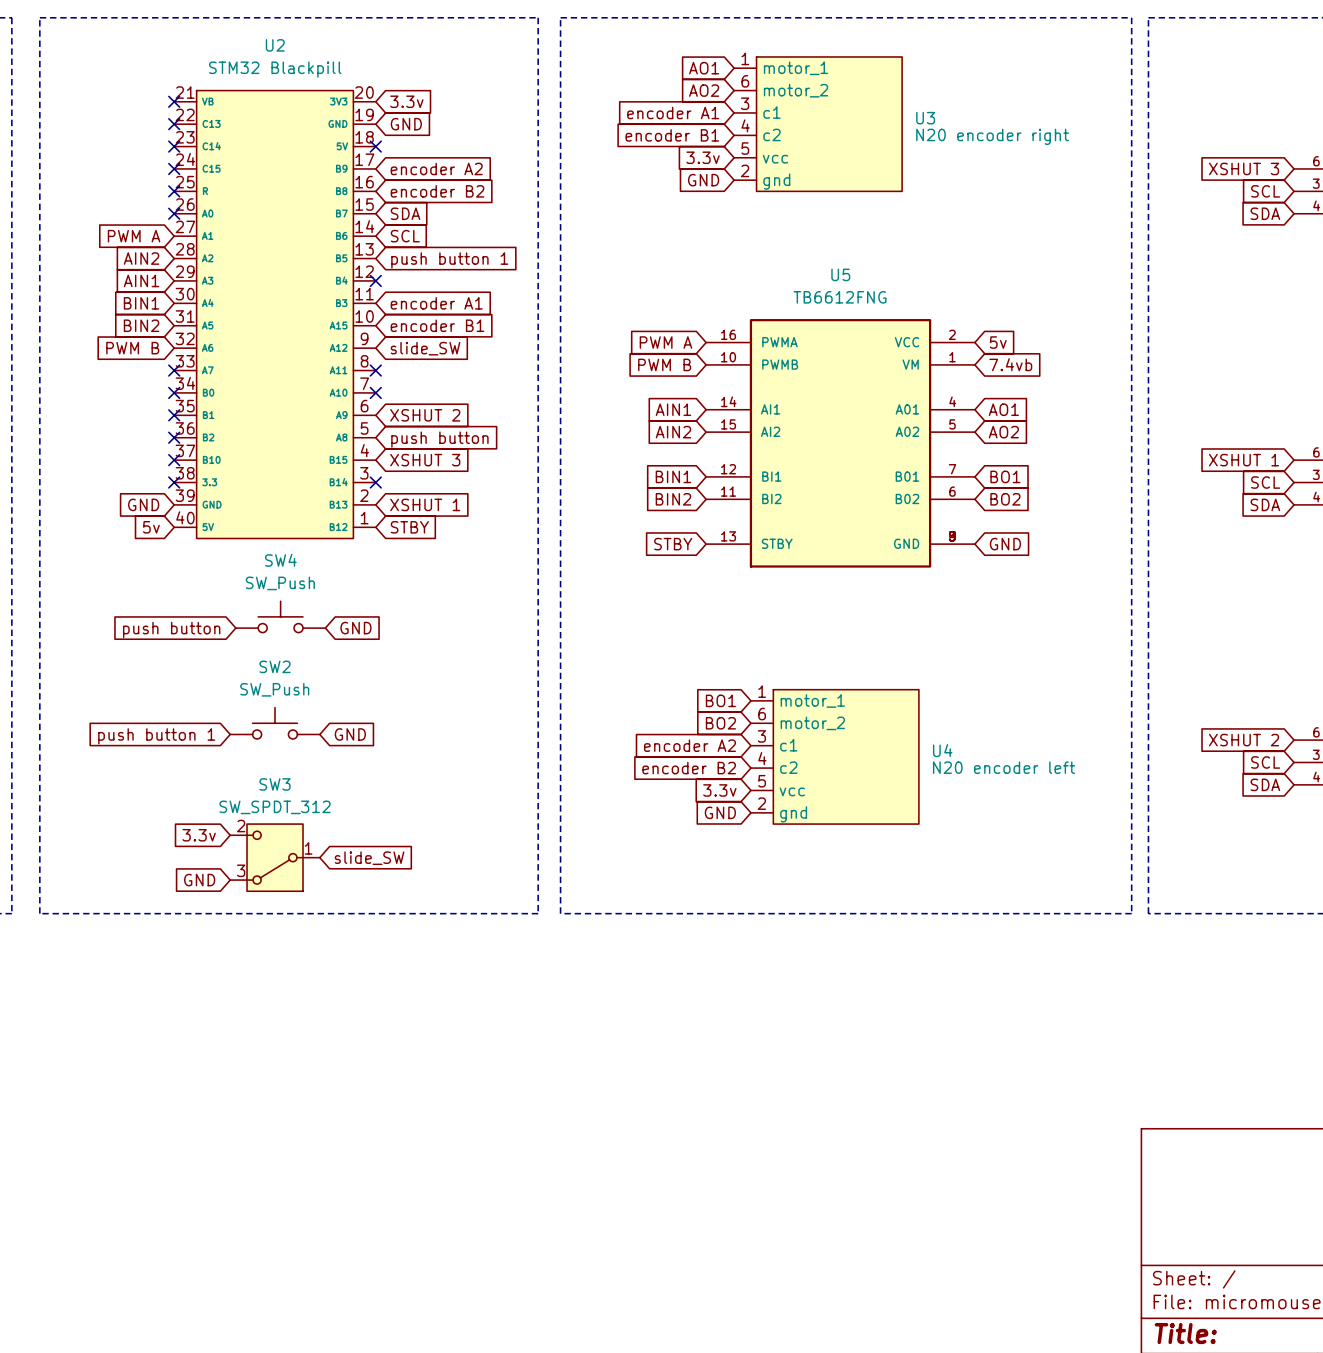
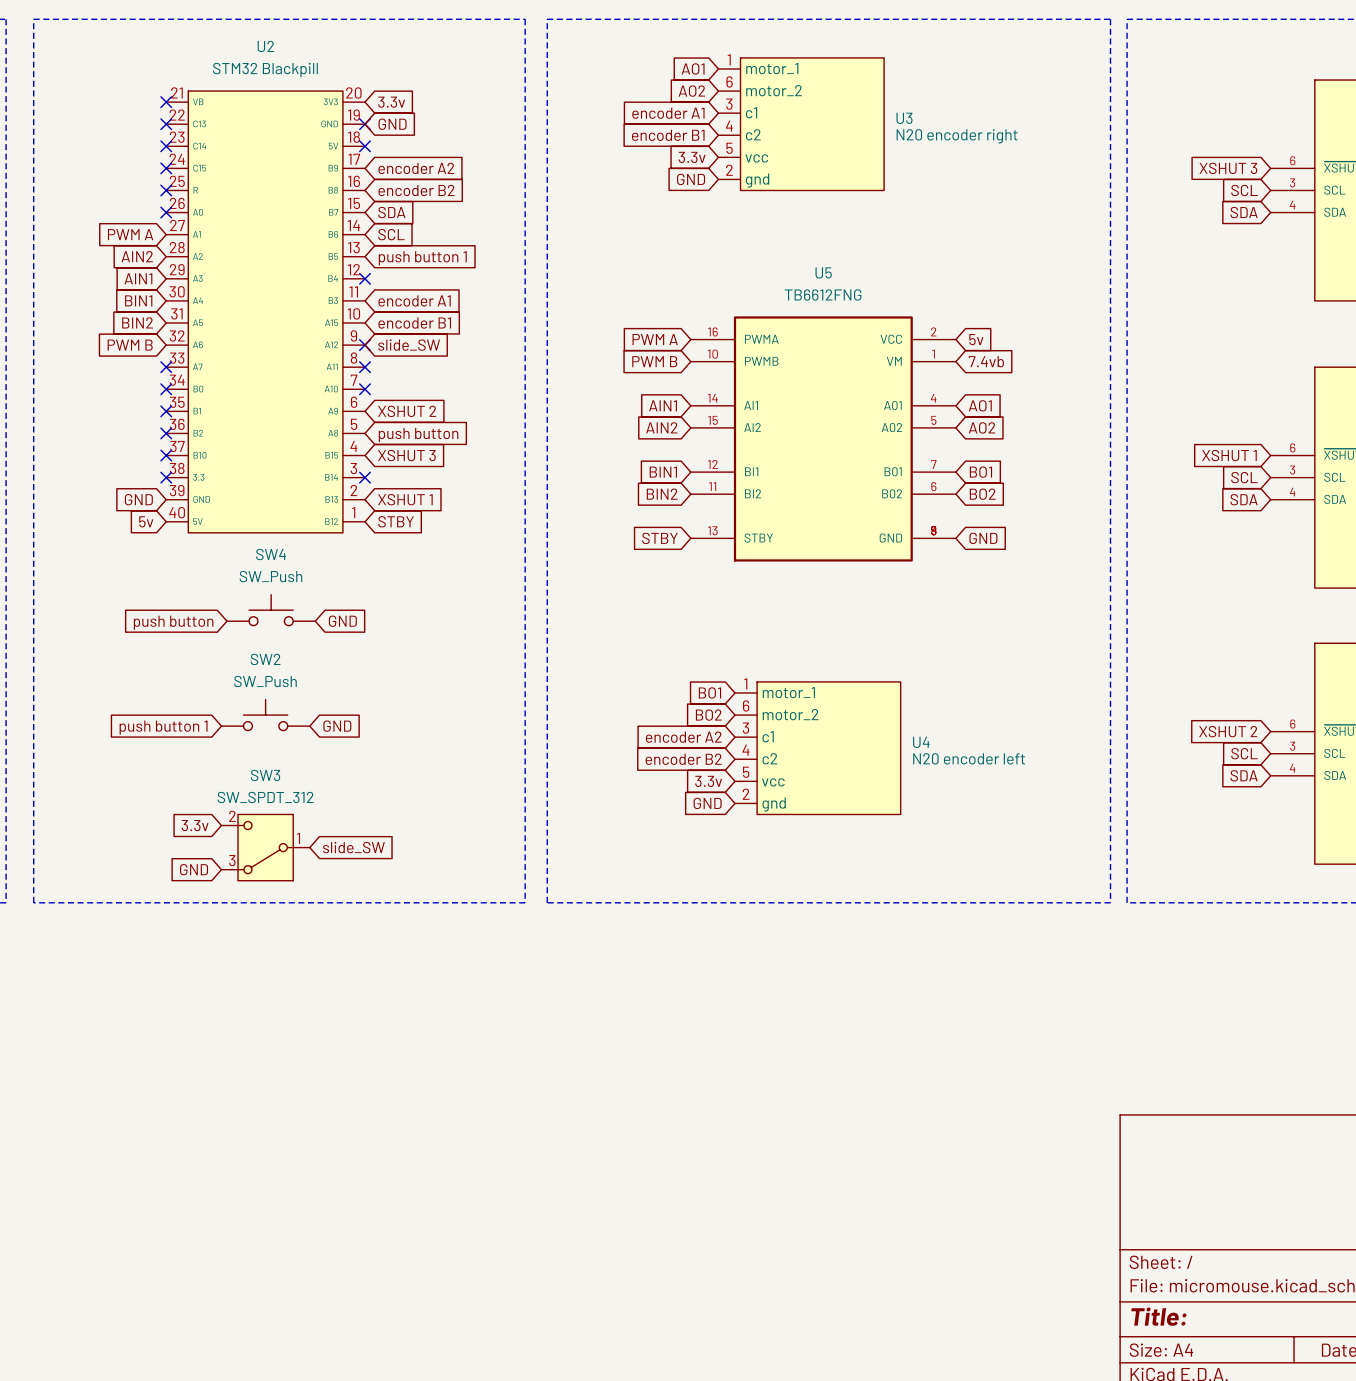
no-connect mark: none -> (365, 124)
no-connect mark: none -> (365, 345)

